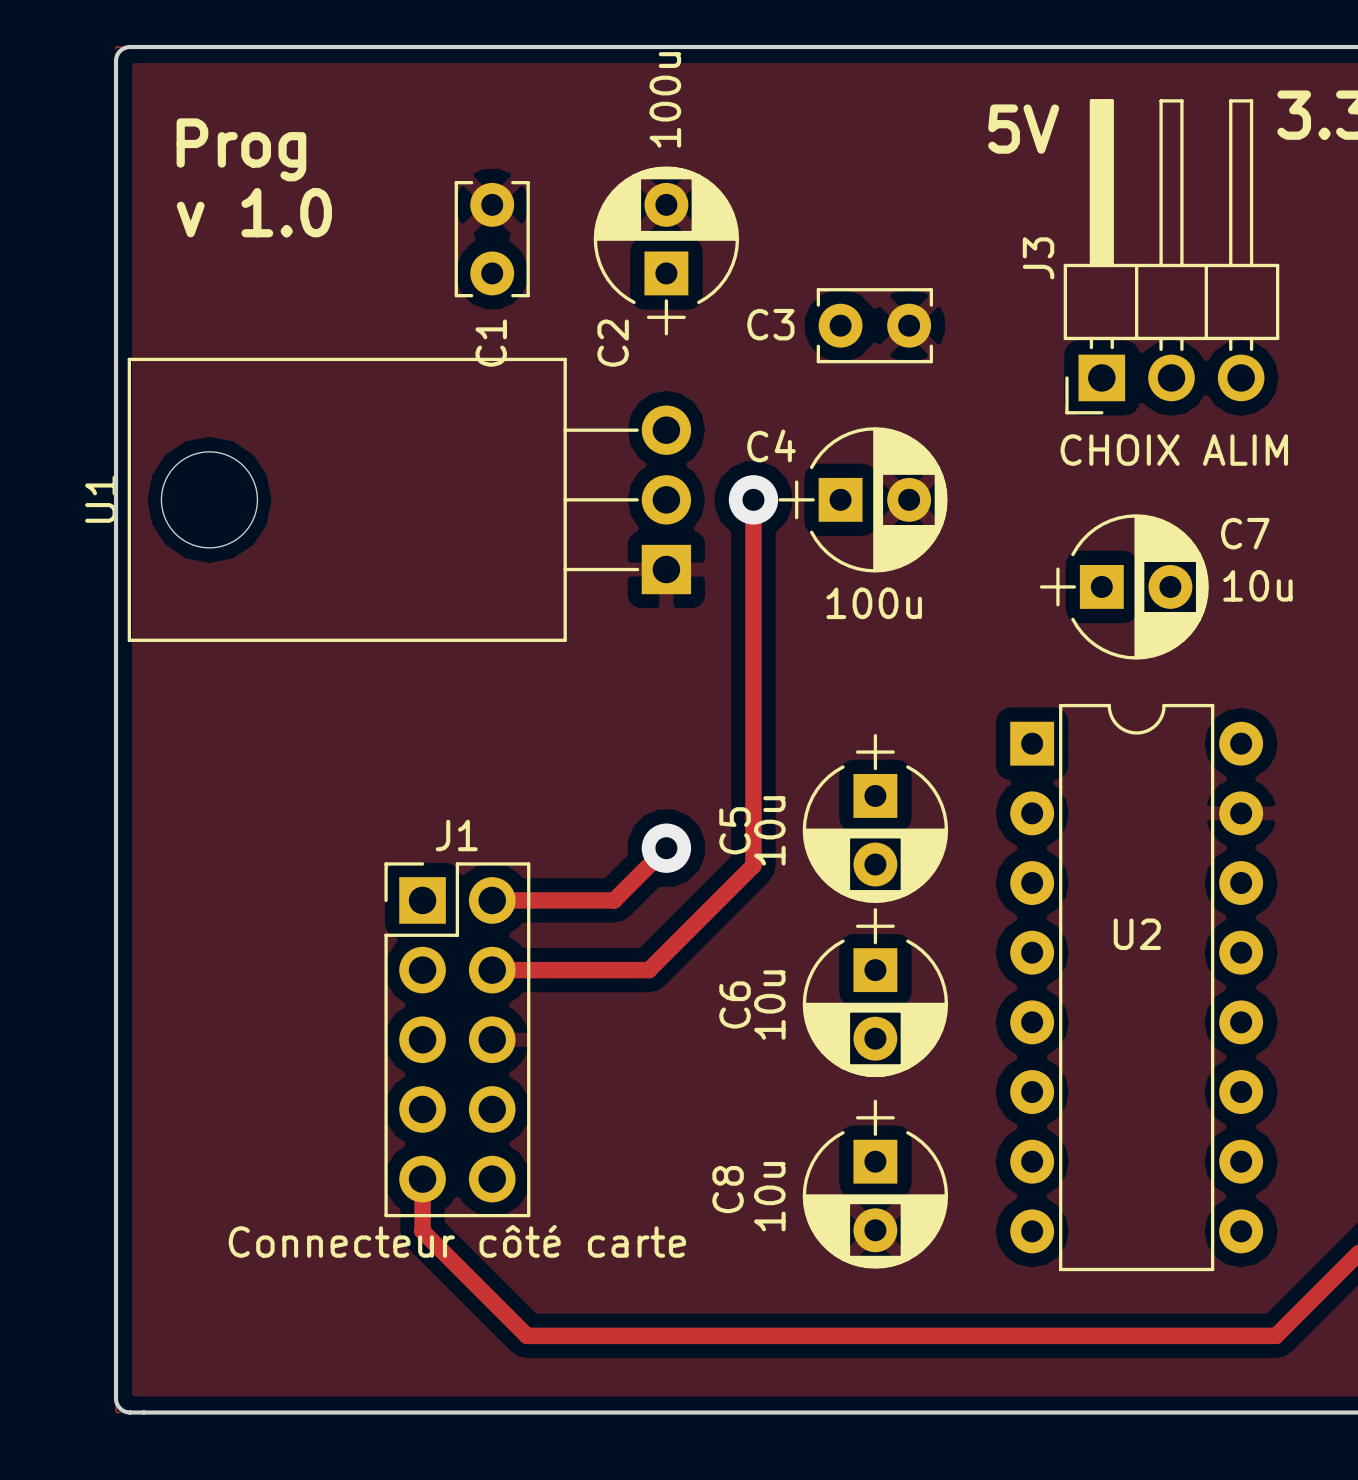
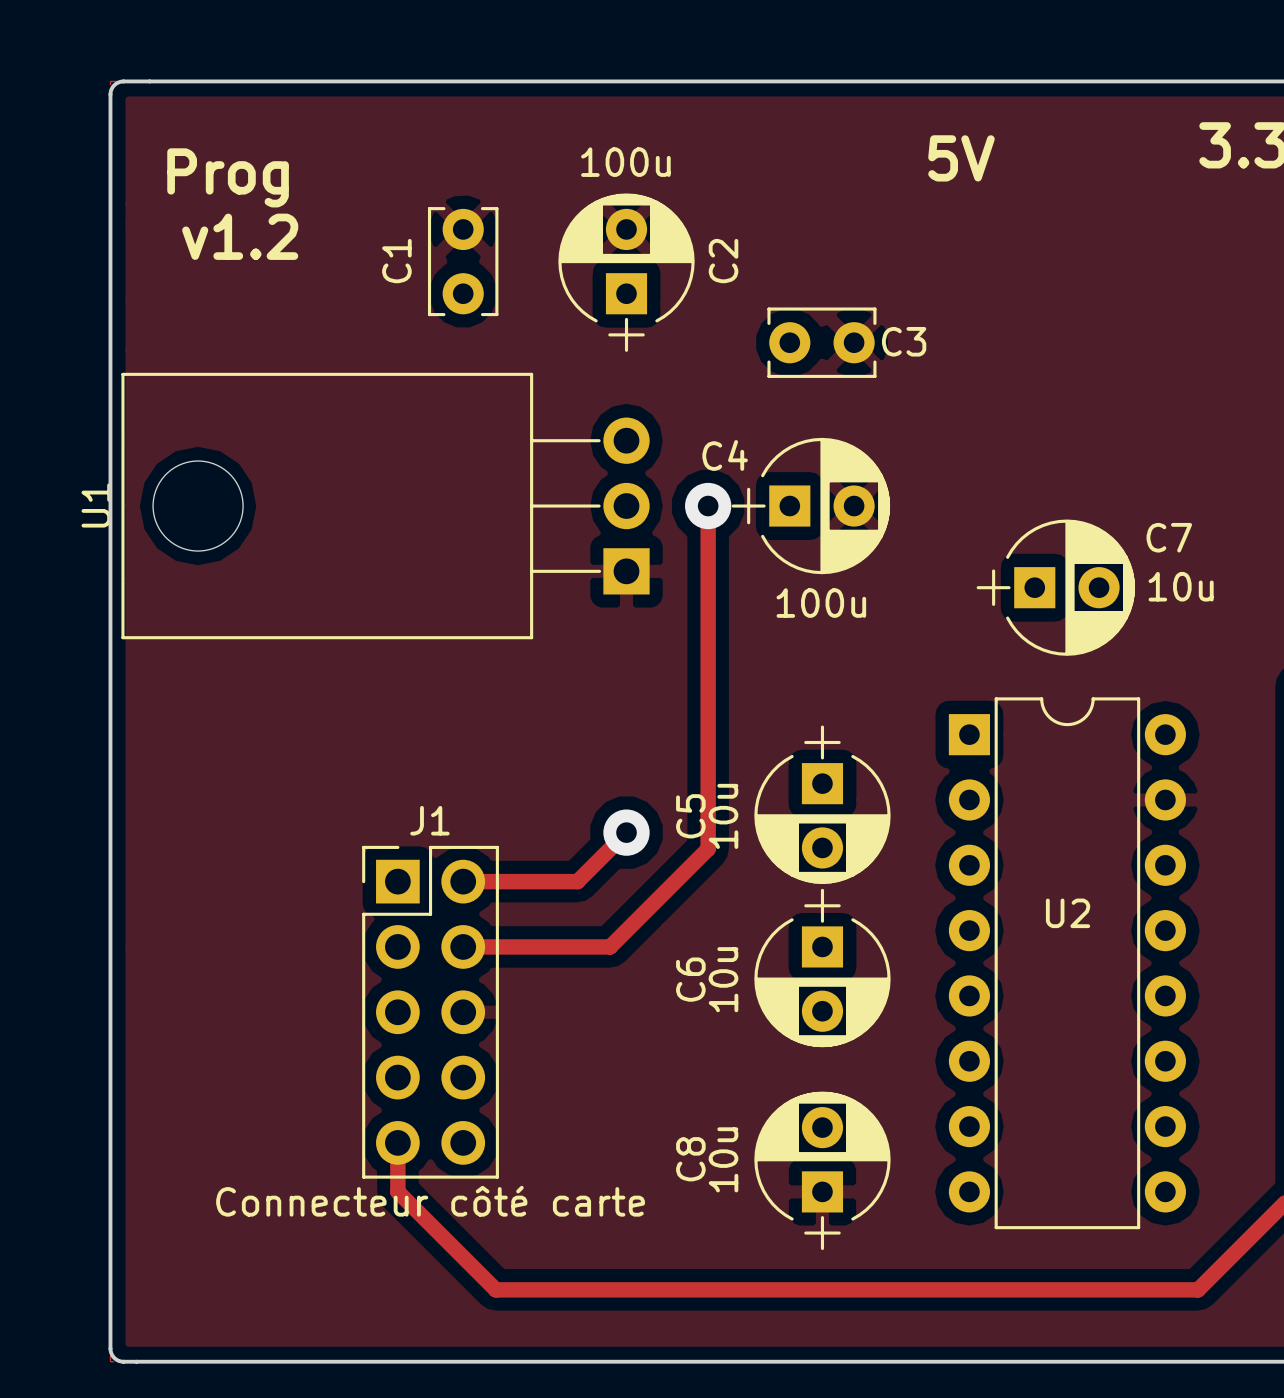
C2 value rotation: 0° (665, 99) -> 90° clockwise (625, 162)
text: v 1.0 (254, 212) -> v1.2 (240, 236)
J3: CHOIX ALIM (1171, 256) -> none
C3 name position: C3 (770, 324) -> C3 (904, 341)
C1 name position: C1 (491, 343) -> C1 (396, 261)
C2 name position: C2 (613, 343) -> C2 (723, 261)
C8 rotation: 0° (875, 1184) -> 180° (822, 1170)

